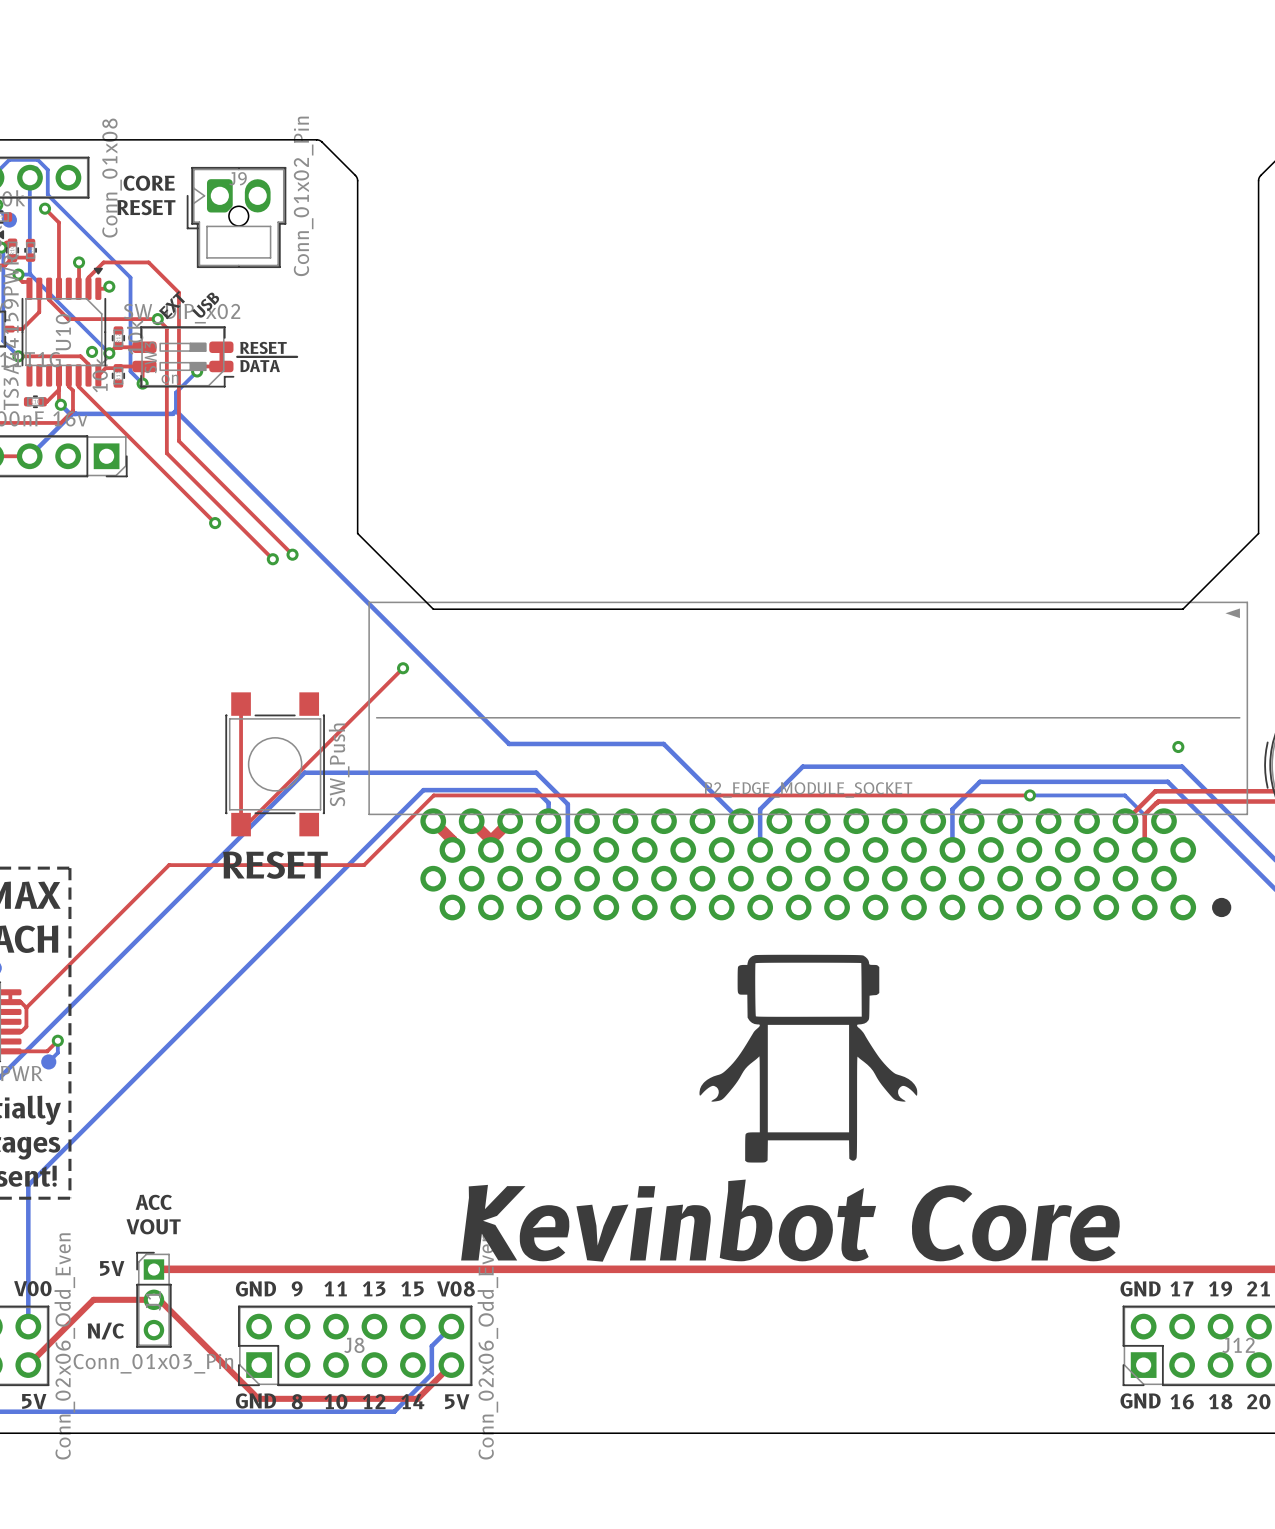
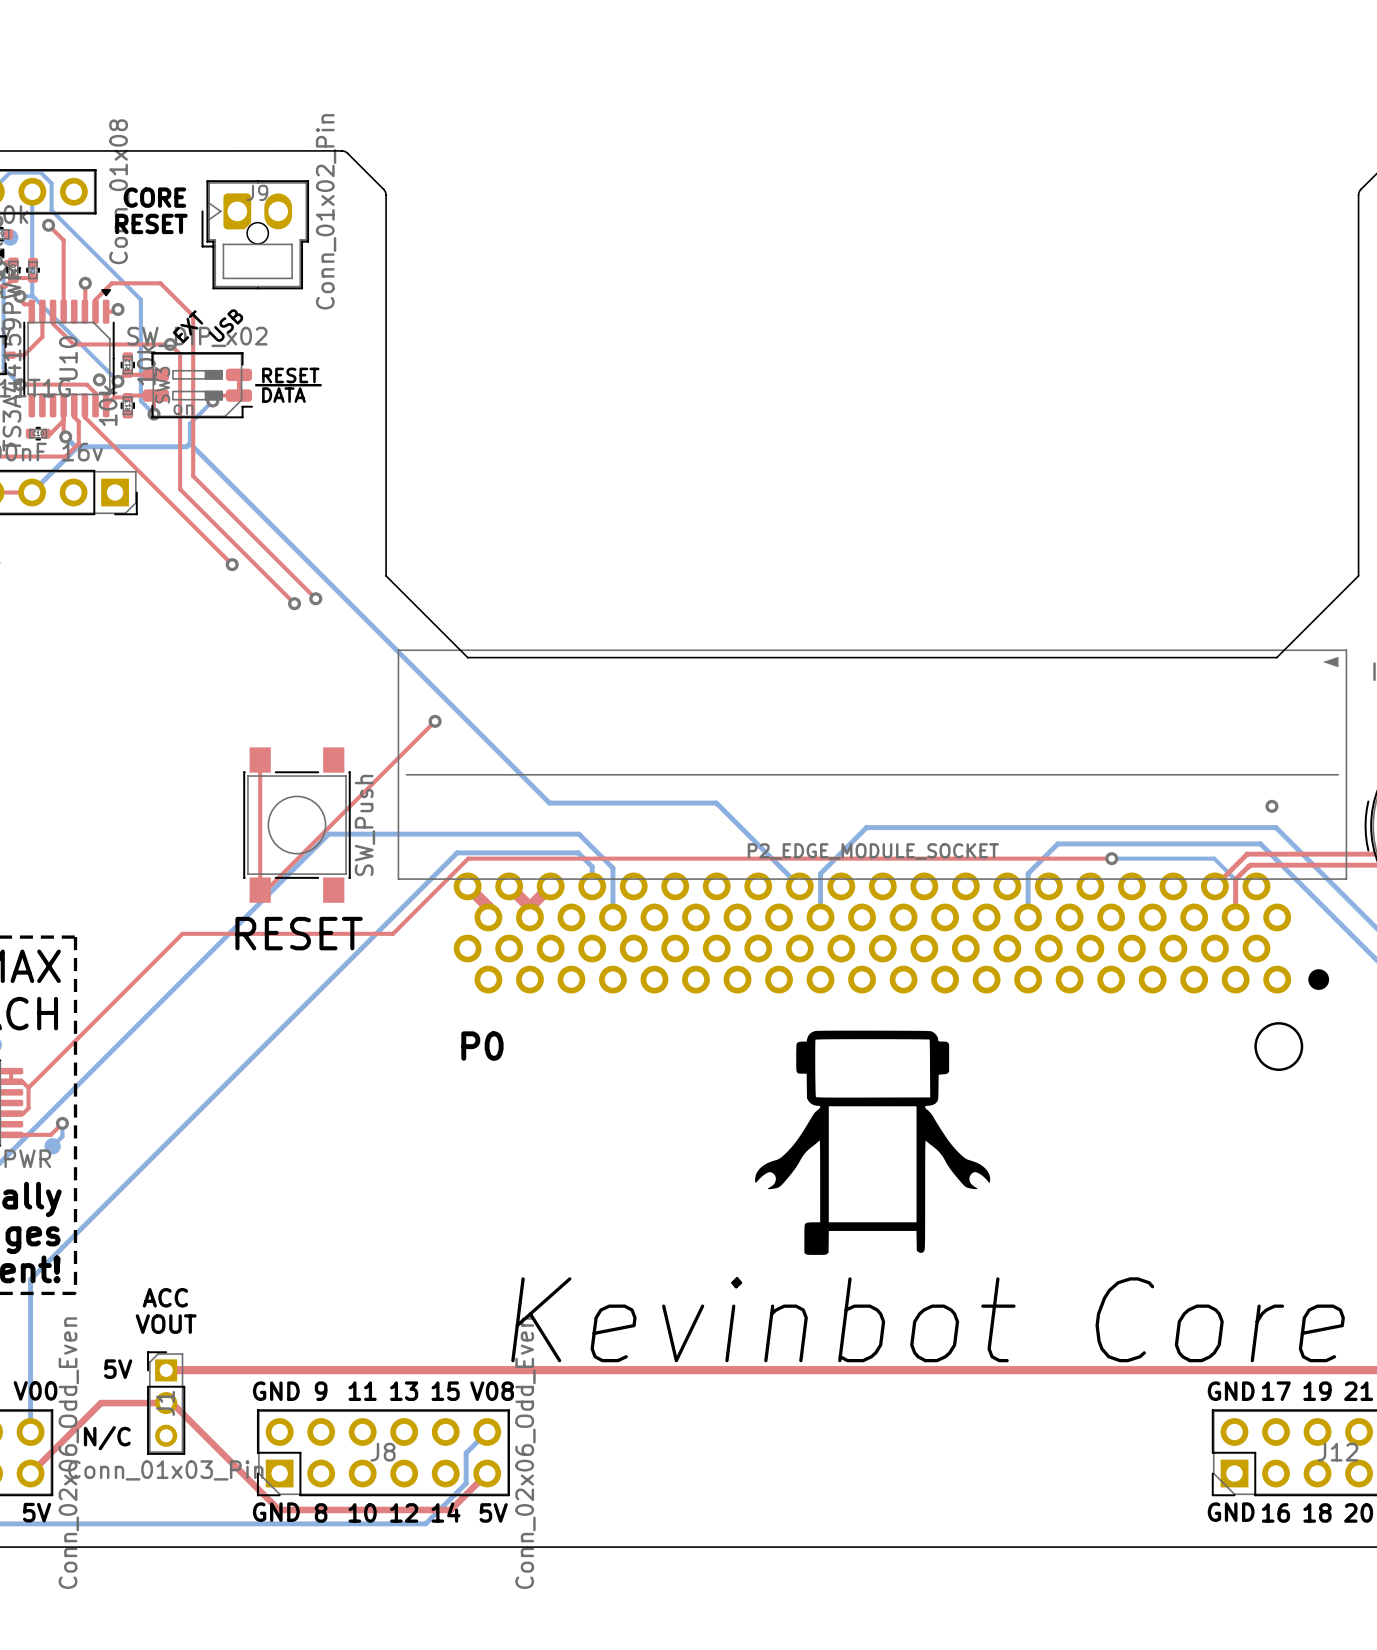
drawing: none -> [1254, 1022, 1304, 1071]
text: none -> P0 (482, 1046)

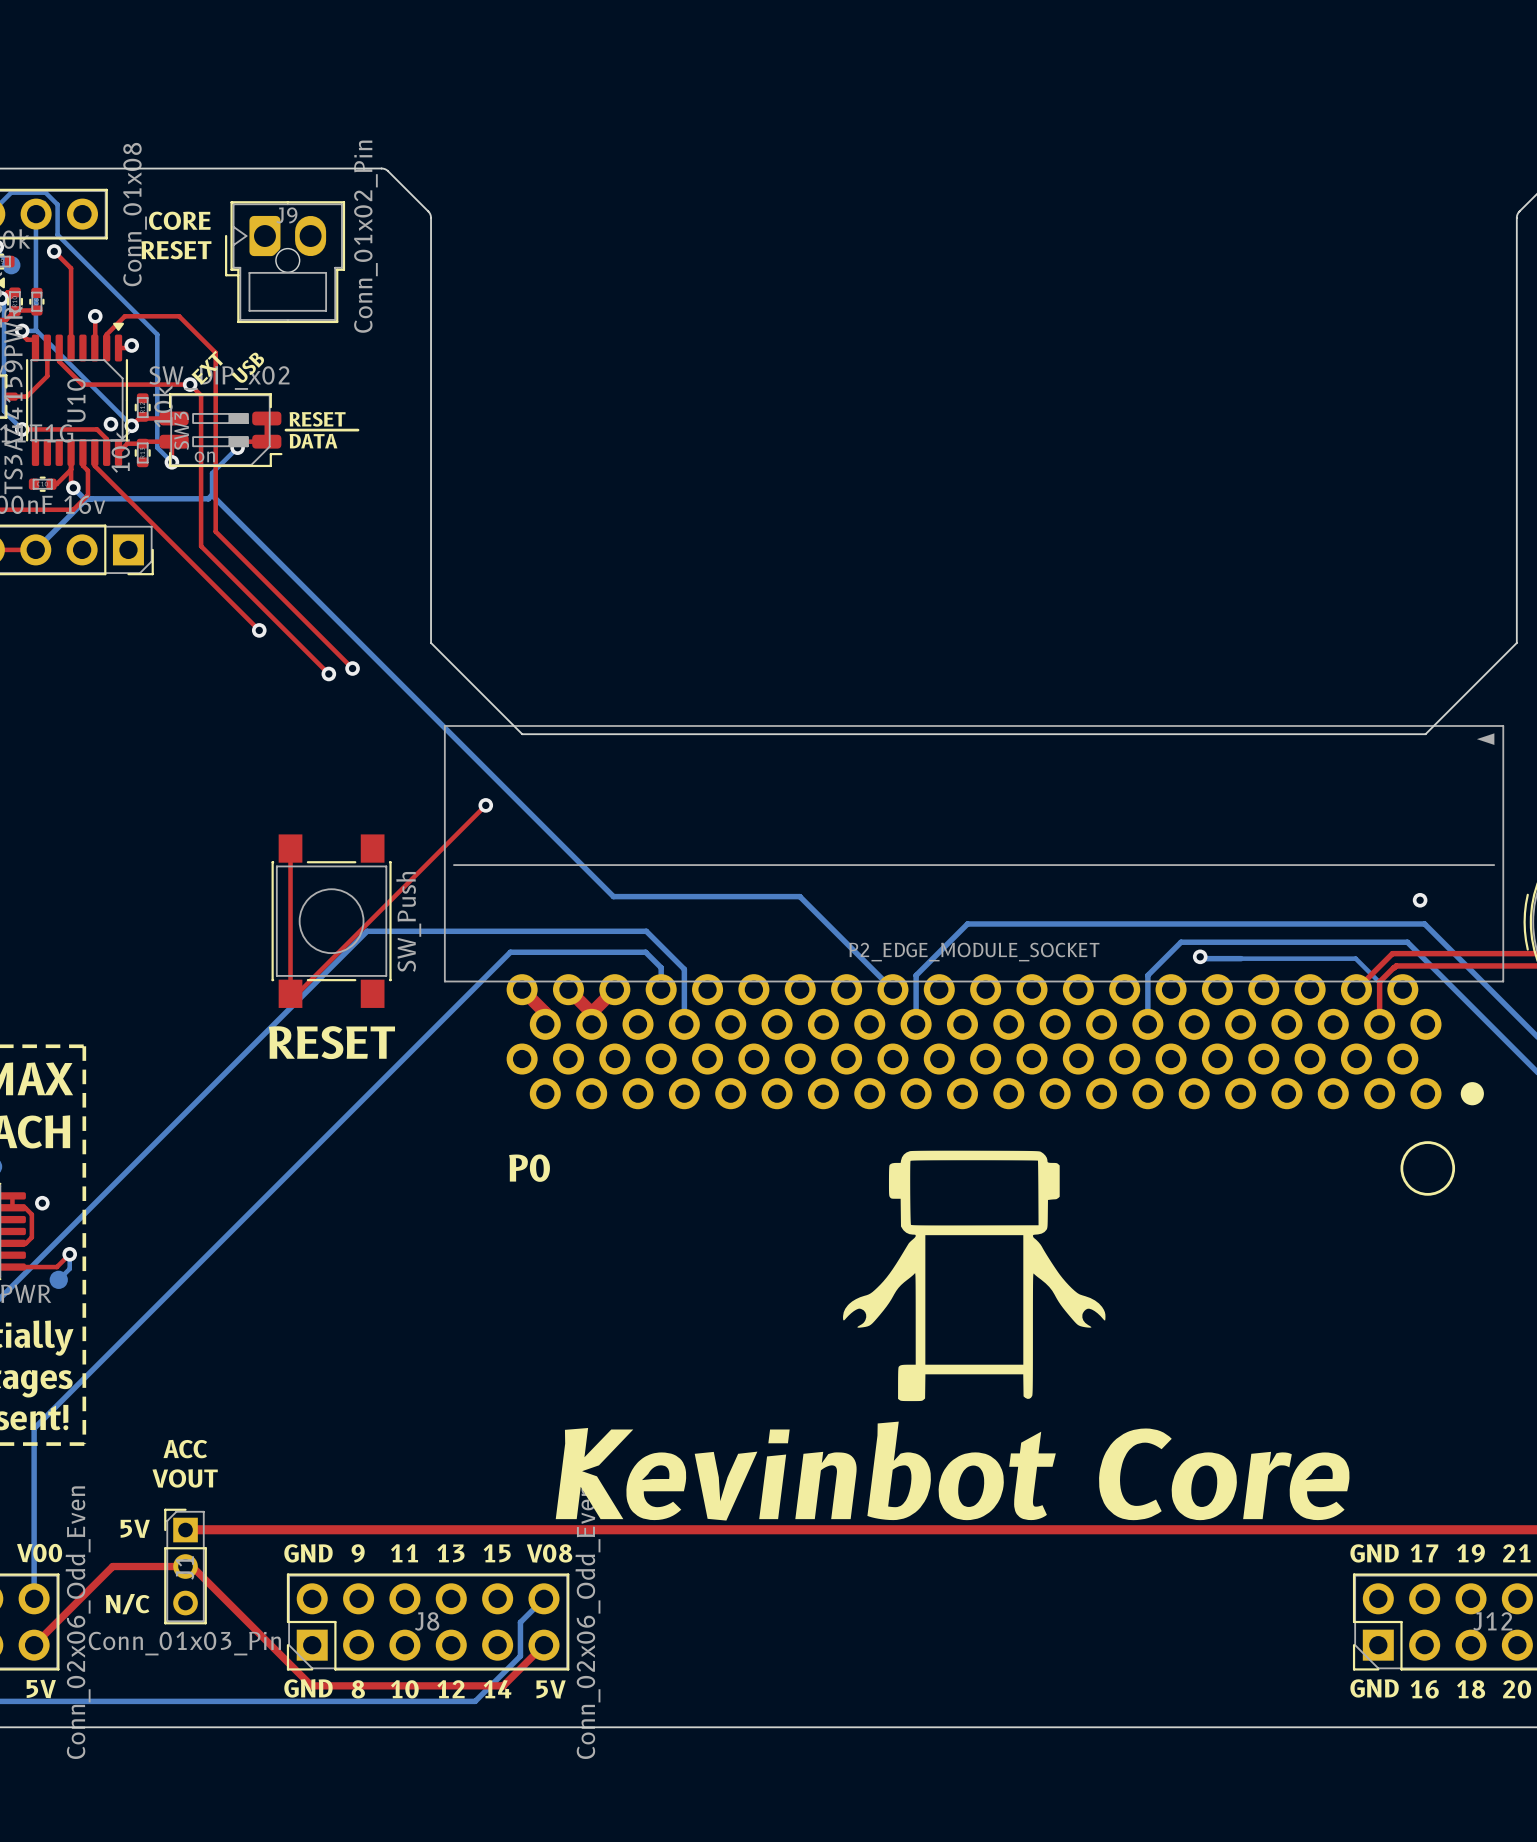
bottom track: none -> (1200, 956) (1202, 958) (1241, 958)
top track: (1111, 858) (468, 858) (393, 933) (182, 933) (28, 1087) -> none
via position: (1111, 858) -> (1200, 956)
via: none -> (42, 1203)

